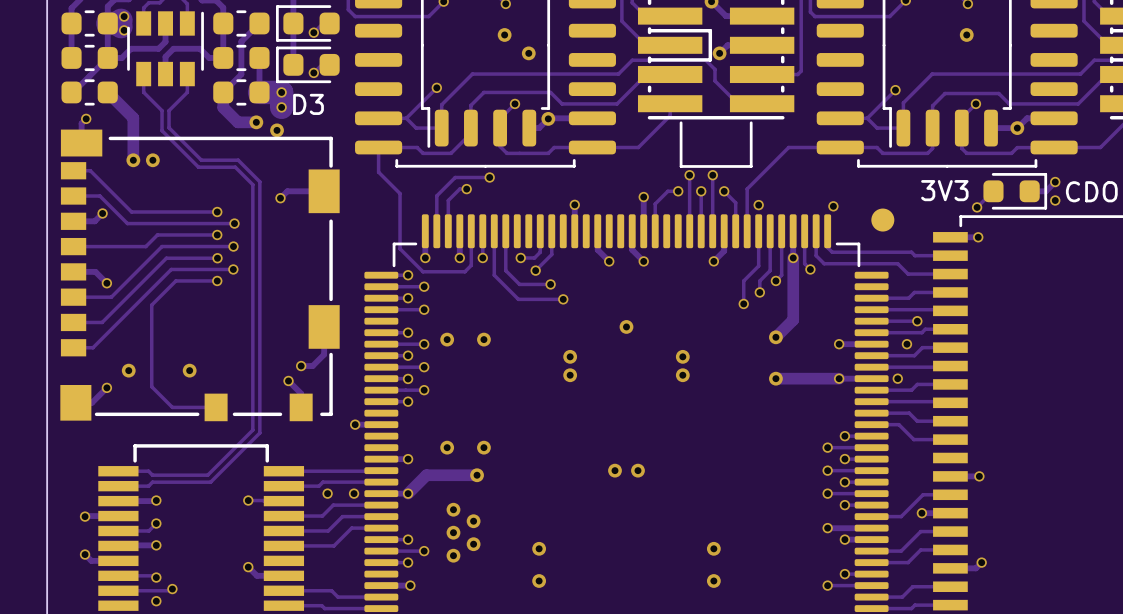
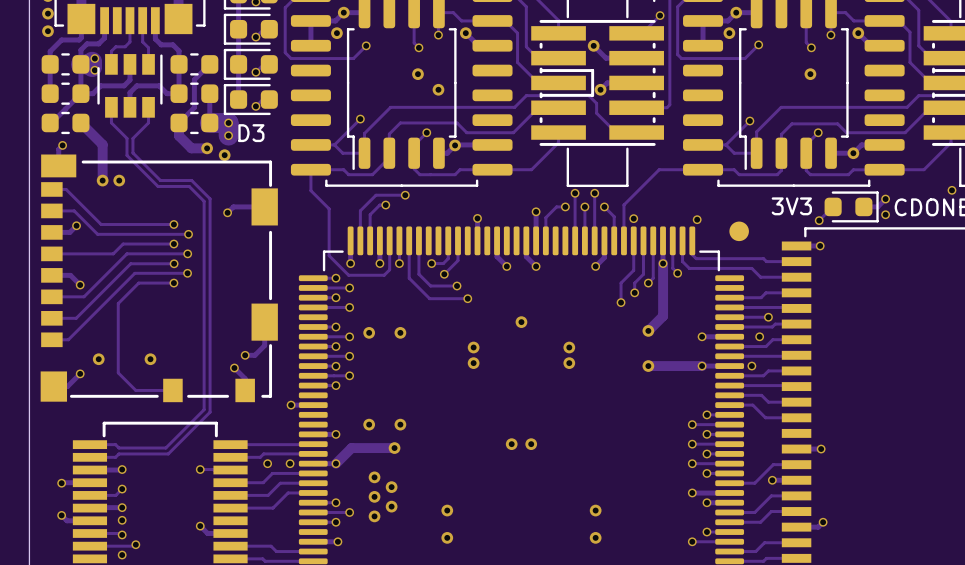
via: none -> (122, 520)

